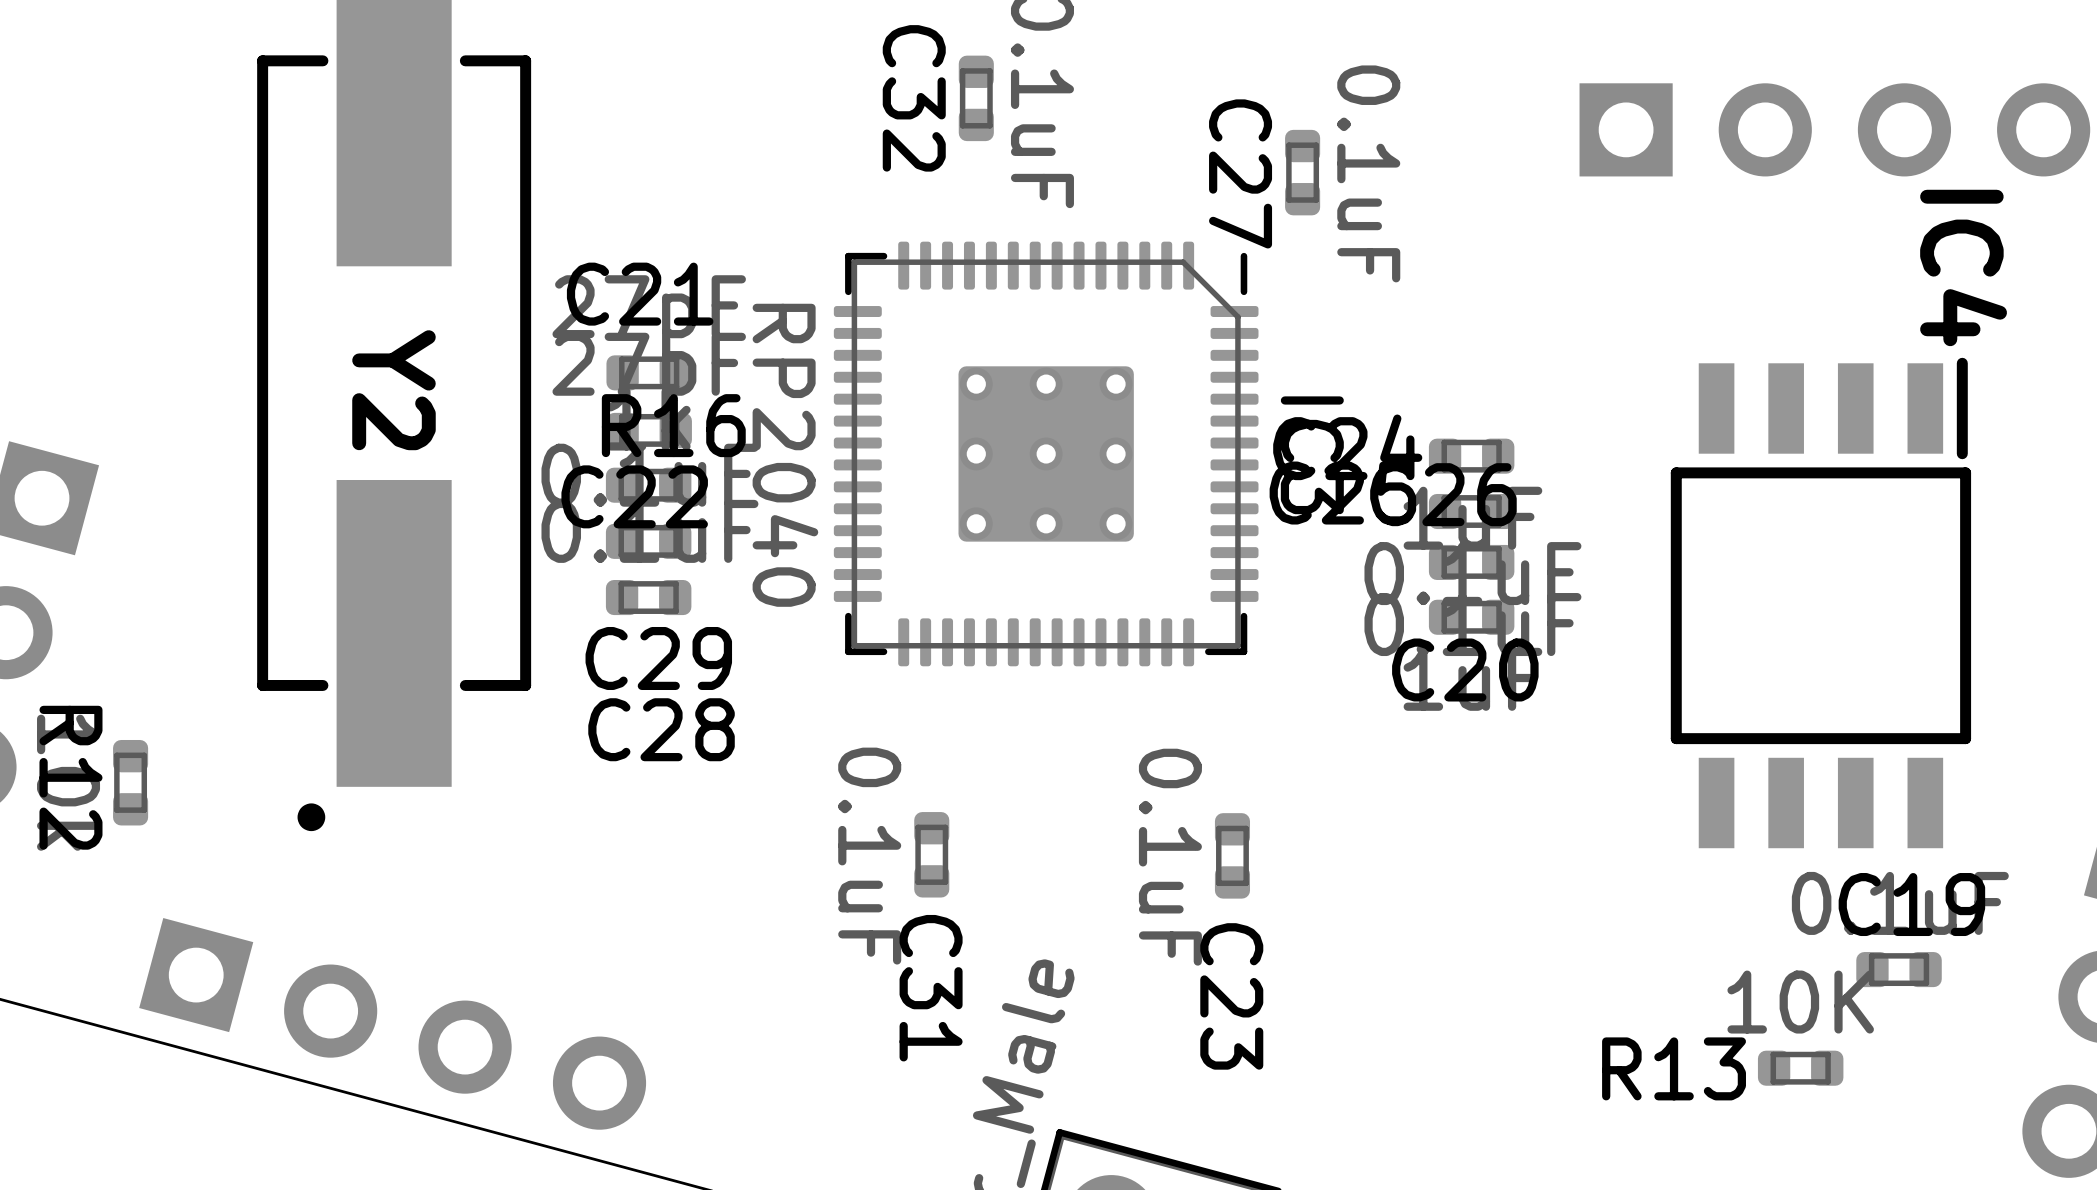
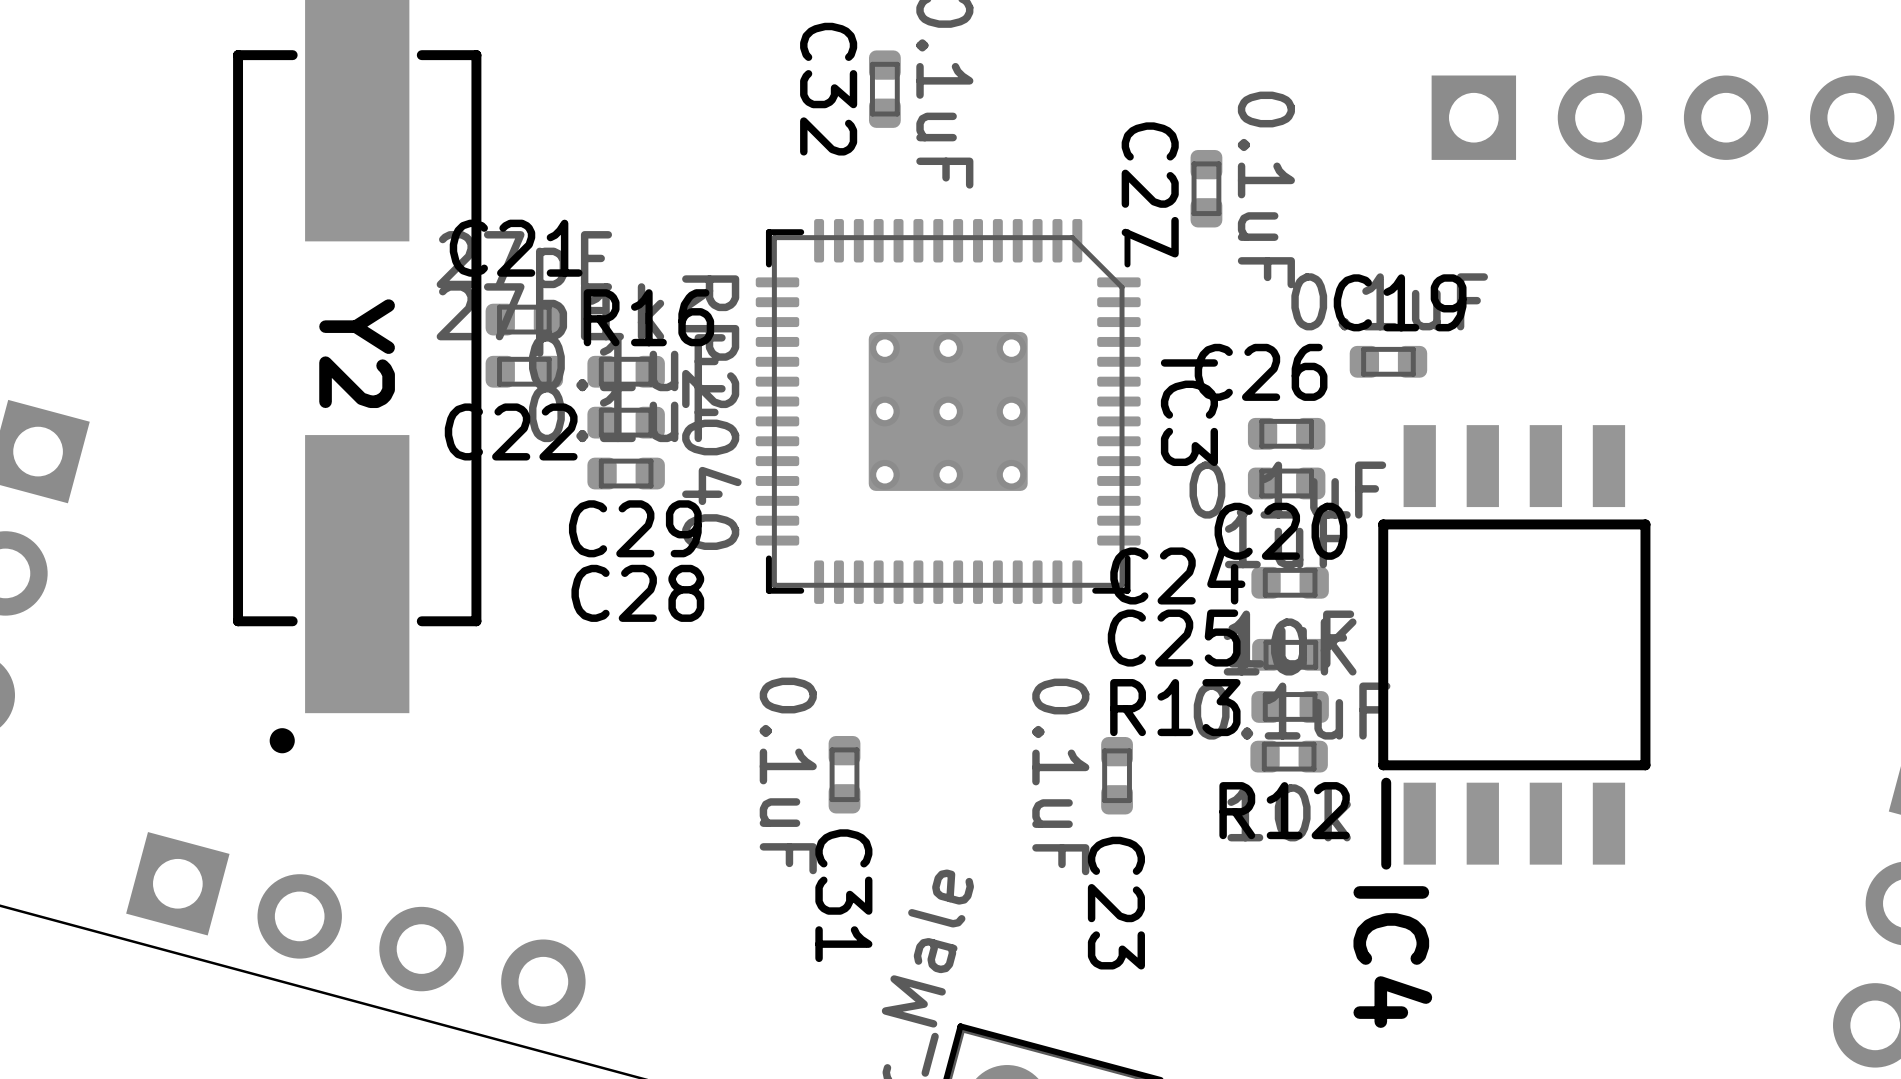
C27 position: (1302, 172) -> (1206, 188)
C21 position: (649, 372) -> (524, 319)
C22 position: (649, 430) -> (524, 371)
C24 position: (1471, 456) -> (1290, 582)
R16 position: (648, 485) -> (626, 371)
C25 position: (1471, 511) -> (1290, 654)
C29 position: (648, 541) -> (626, 422)
C26 position: (1471, 562) -> (1286, 433)
C28 position: (648, 597) -> (626, 473)
IC4 rotation: 0° (1820, 603) -> 180° (1514, 647)
C20 position: (1471, 617) -> (1286, 483)
R12 rotation: 0° (130, 782) -> 90° clockwise (1289, 756)
R12 position: (130, 782) -> (1289, 756)
C19 position: (1899, 969) -> (1388, 361)
R13 position: (1800, 1068) -> (1290, 706)

